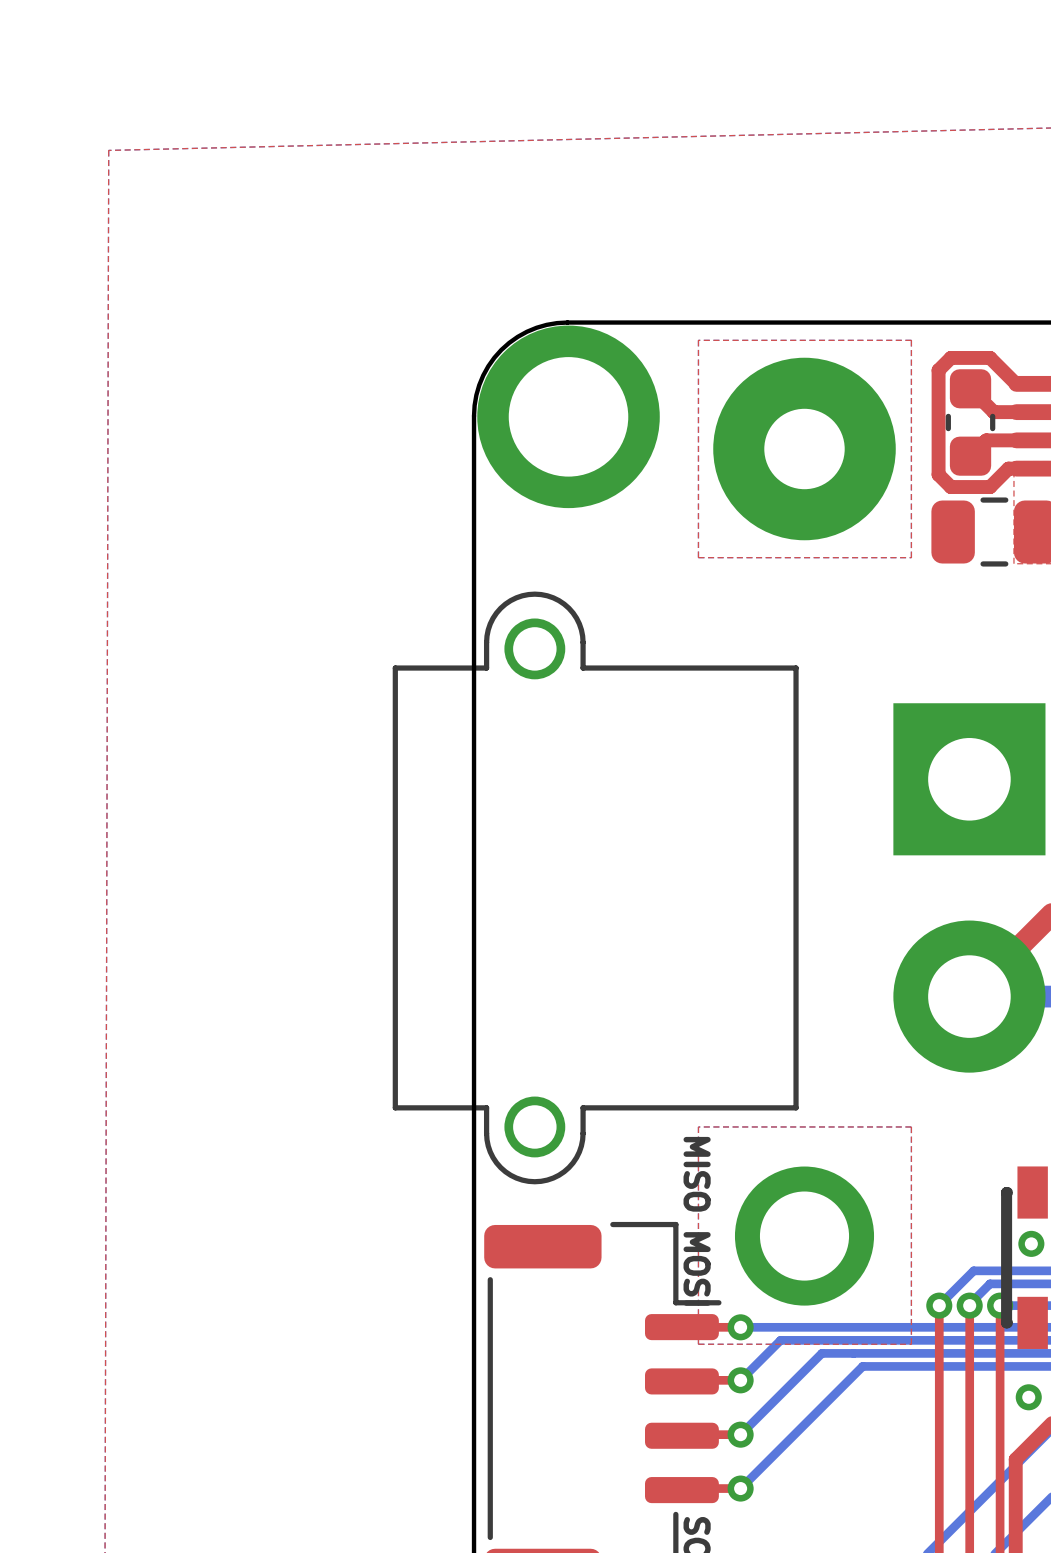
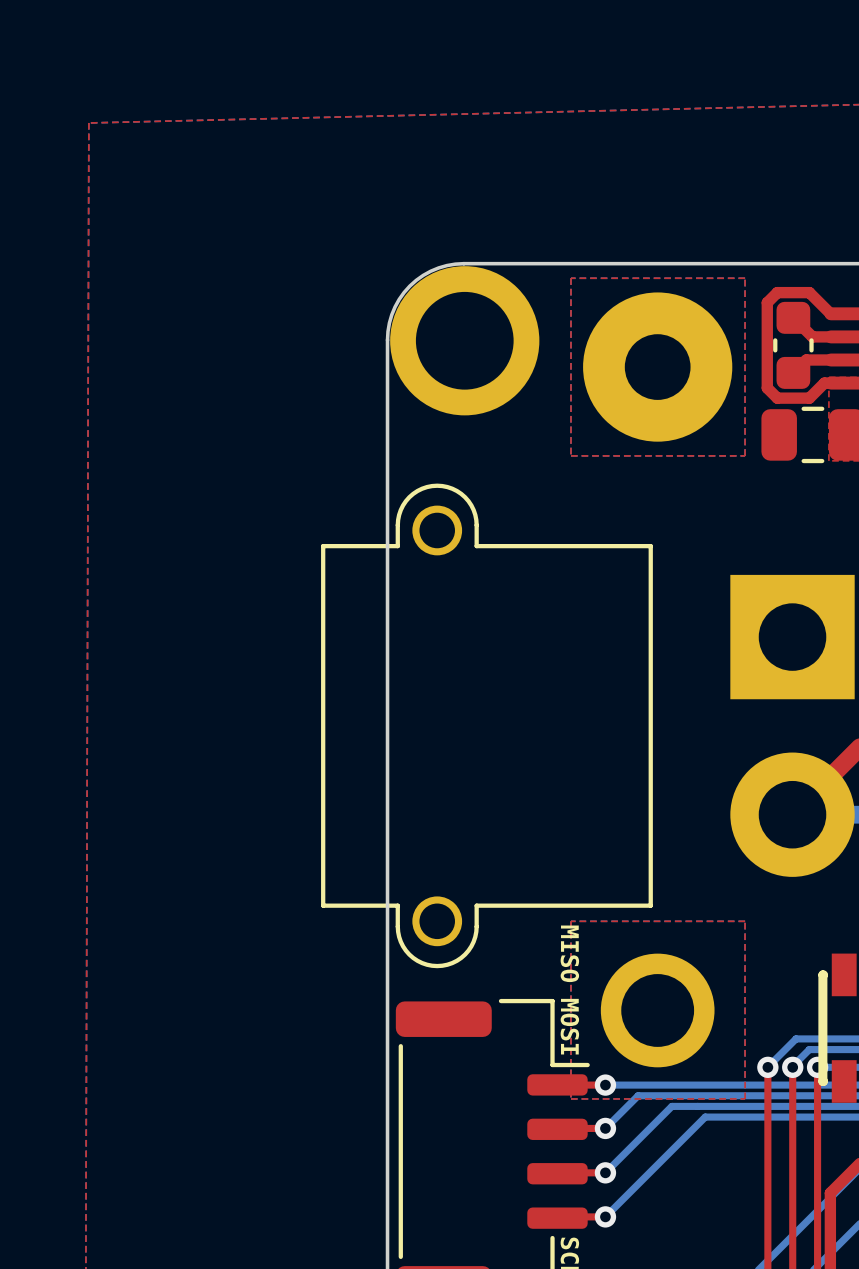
via: (1031, 1243) -> none
via: (1028, 1397) -> none

